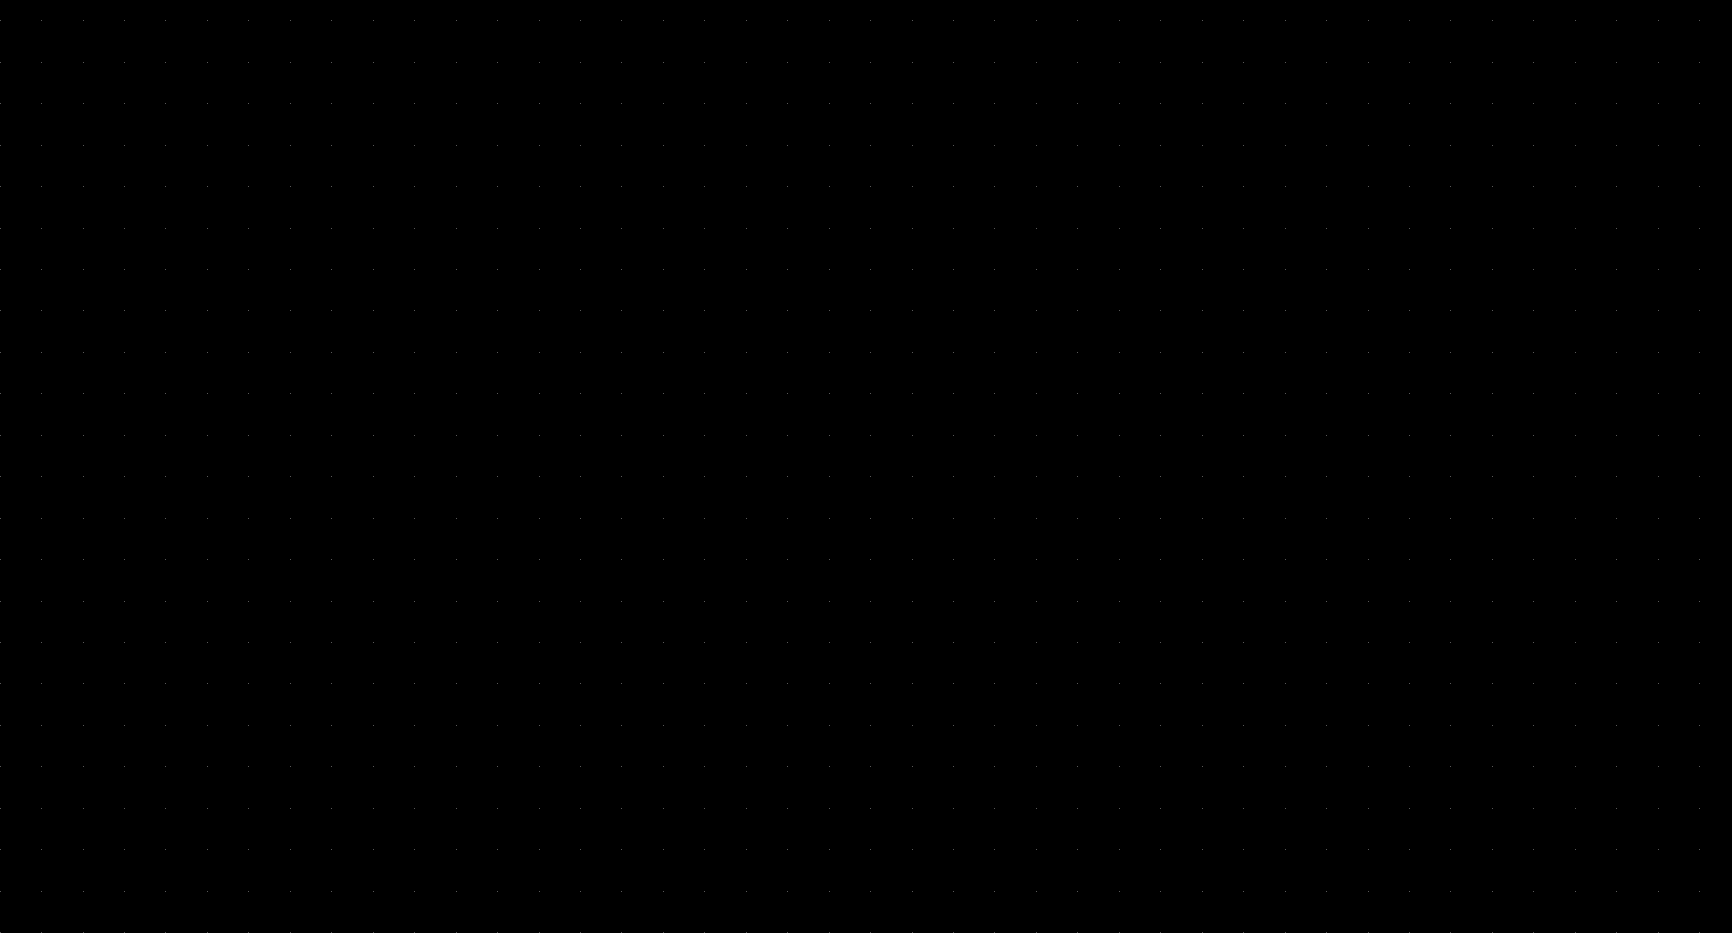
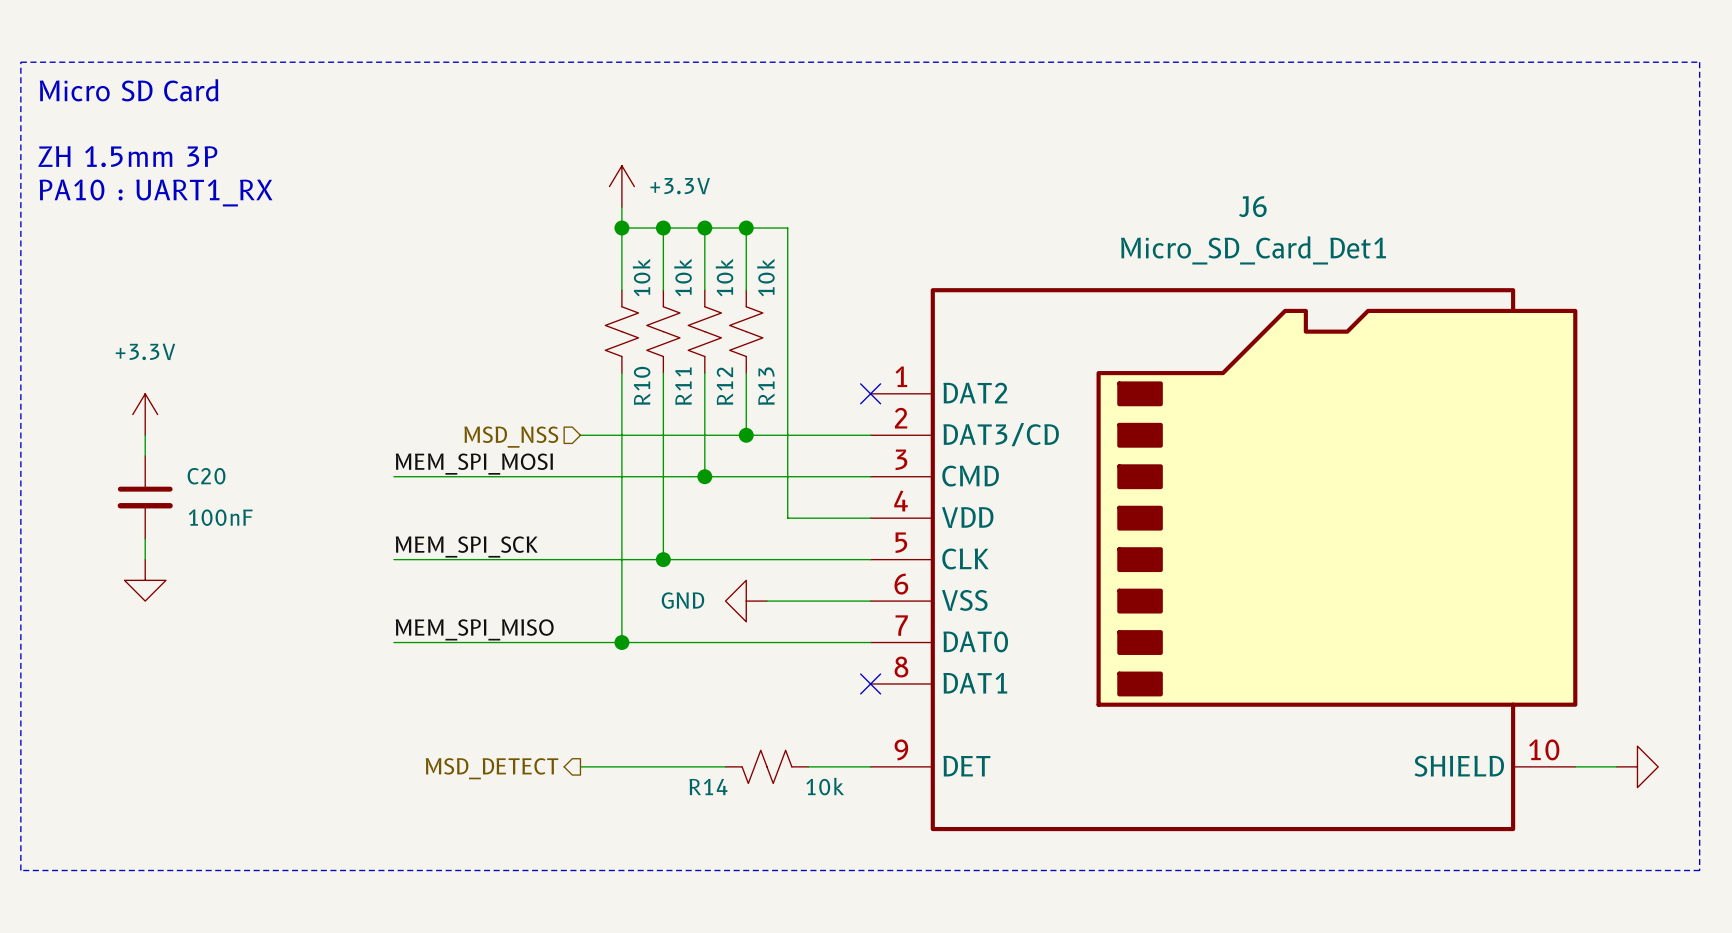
line: none -> (20, 62) (1699, 62) (1699, 870) (20, 870) (20, 62)
text: none -> Micro SD Card (129, 90)
text: none -> ZH 1.5mm 3P (127, 156)
power symbol: none -> +3.3V (621, 186)
text: none -> PA10 : UART1_RX (156, 193)
wire: none -> (621, 207) (621, 290)
wire: none -> (621, 228) (787, 228) (787, 518) (870, 518)
junction: none -> (621, 228)
wire: none -> (663, 228) (663, 290)
junction: none -> (663, 228)
wire: none -> (704, 228) (704, 290)
junction: none -> (704, 228)
wire: none -> (746, 228) (746, 290)
junction: none -> (746, 228)
R10: none -> 10k (621, 331)
R11: none -> 10k (663, 331)
R12: none -> 10k (704, 331)
R13: none -> 10k (746, 331)
wire: none -> (621, 373) (621, 642)
wire: none -> (663, 373) (663, 559)
wire: none -> (704, 373) (704, 476)
wire: none -> (746, 373) (746, 435)
no-connect mark: none -> (870, 393)
power symbol: none -> +3.3V (145, 414)
wire: none -> (145, 435) (145, 456)
wire: none -> (580, 435) (870, 435)
junction: none -> (746, 435)
hierarchical label: none -> MSD_NSS (511, 437)
label: none -> MEM_SPI_MOSI (474, 464)
wire: none -> (393, 476) (870, 476)
junction: none -> (704, 476)
C20: none -> 100nF (145, 497)
wire: none -> (145, 538) (145, 559)
label: none -> MEM_SPI_SCK (466, 546)
wire: none -> (393, 559) (870, 559)
junction: none -> (663, 559)
J6: none -> Micro_SD_Card_Det1 (1223, 559)
power symbol: none -> (145, 580)
power symbol: none -> GND (746, 601)
wire: none -> (766, 601) (870, 601)
label: none -> MEM_SPI_MISO (474, 629)
wire: none -> (393, 642) (870, 642)
junction: none -> (621, 642)
no-connect mark: none -> (870, 683)
wire: none -> (580, 766) (725, 766)
R14: none -> 10k (766, 766)
wire: none -> (808, 766) (870, 766)
wire: none -> (1575, 766) (1616, 766)
power symbol: none -> (1637, 766)
hierarchical label: none -> MSD_DETECT (492, 768)

